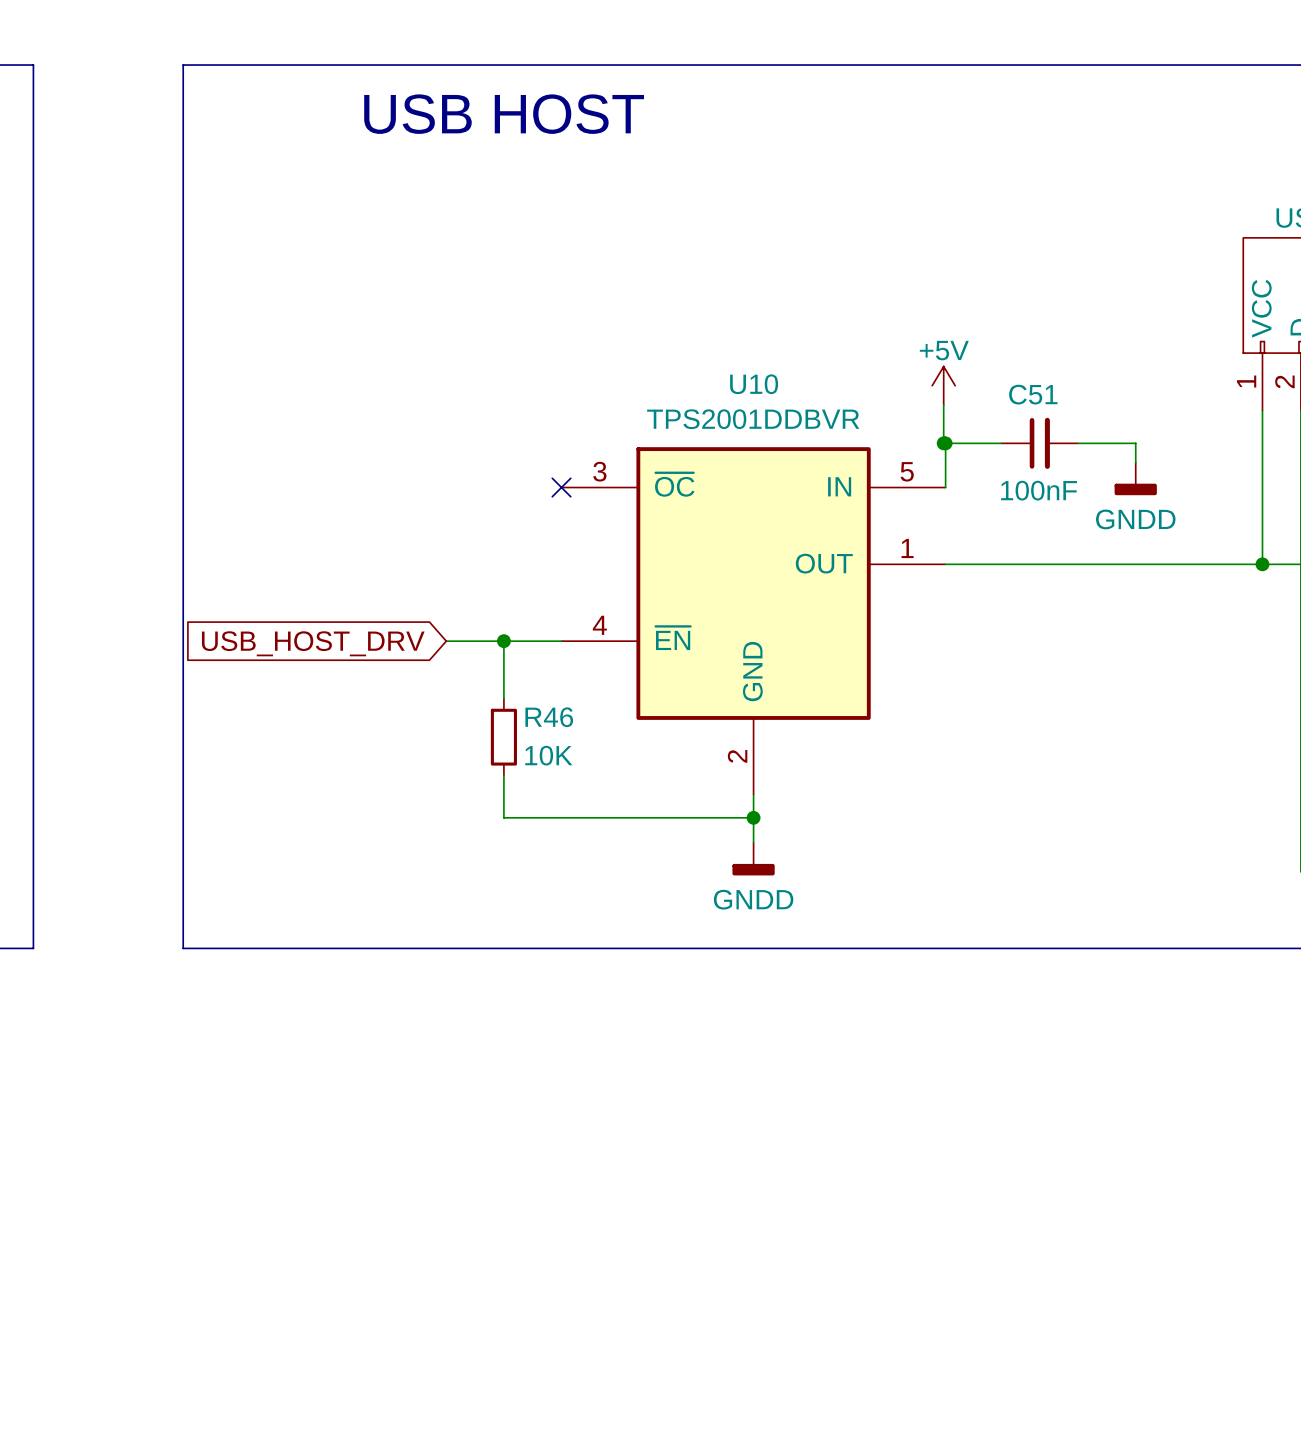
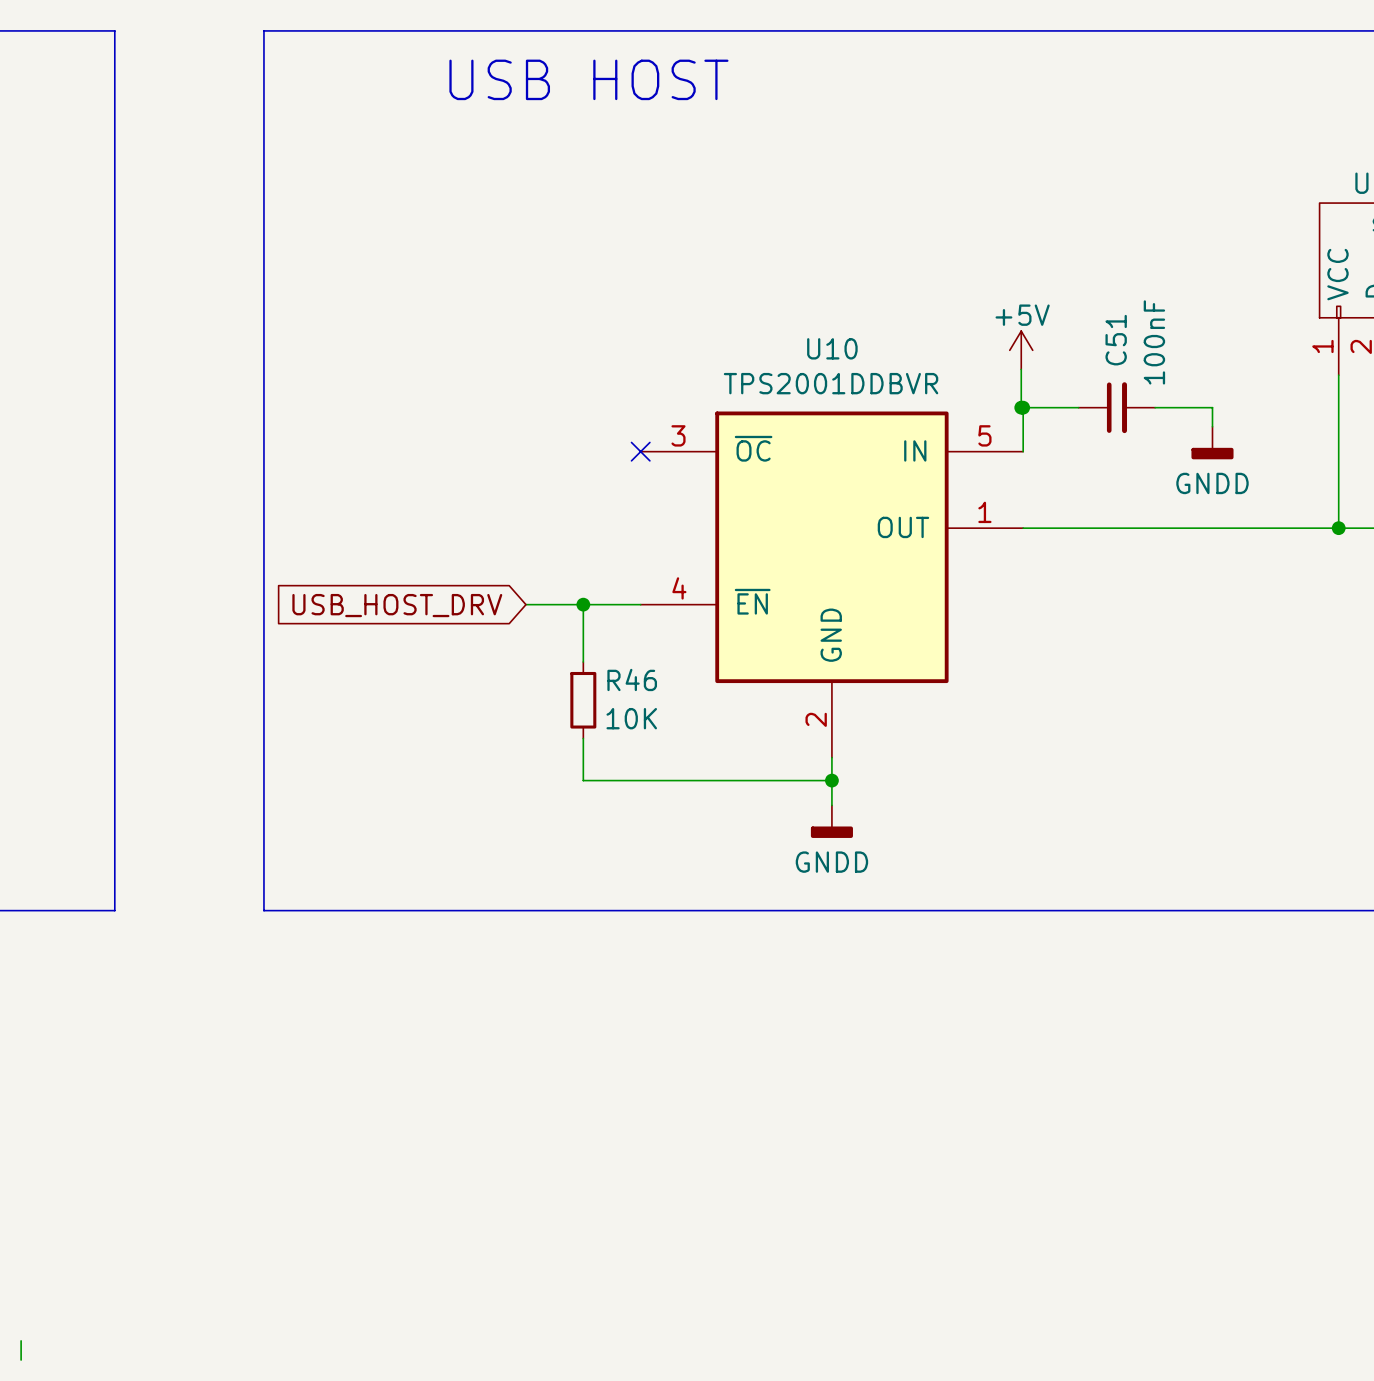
C51 name rotation: 0° (1033, 394) -> 90° counterclockwise (1116, 340)
C51 value rotation: 0° (1039, 490) -> 90° counterclockwise (1154, 342)
C51 value position: 100nF (1039, 490) -> 100nF (1154, 342)

